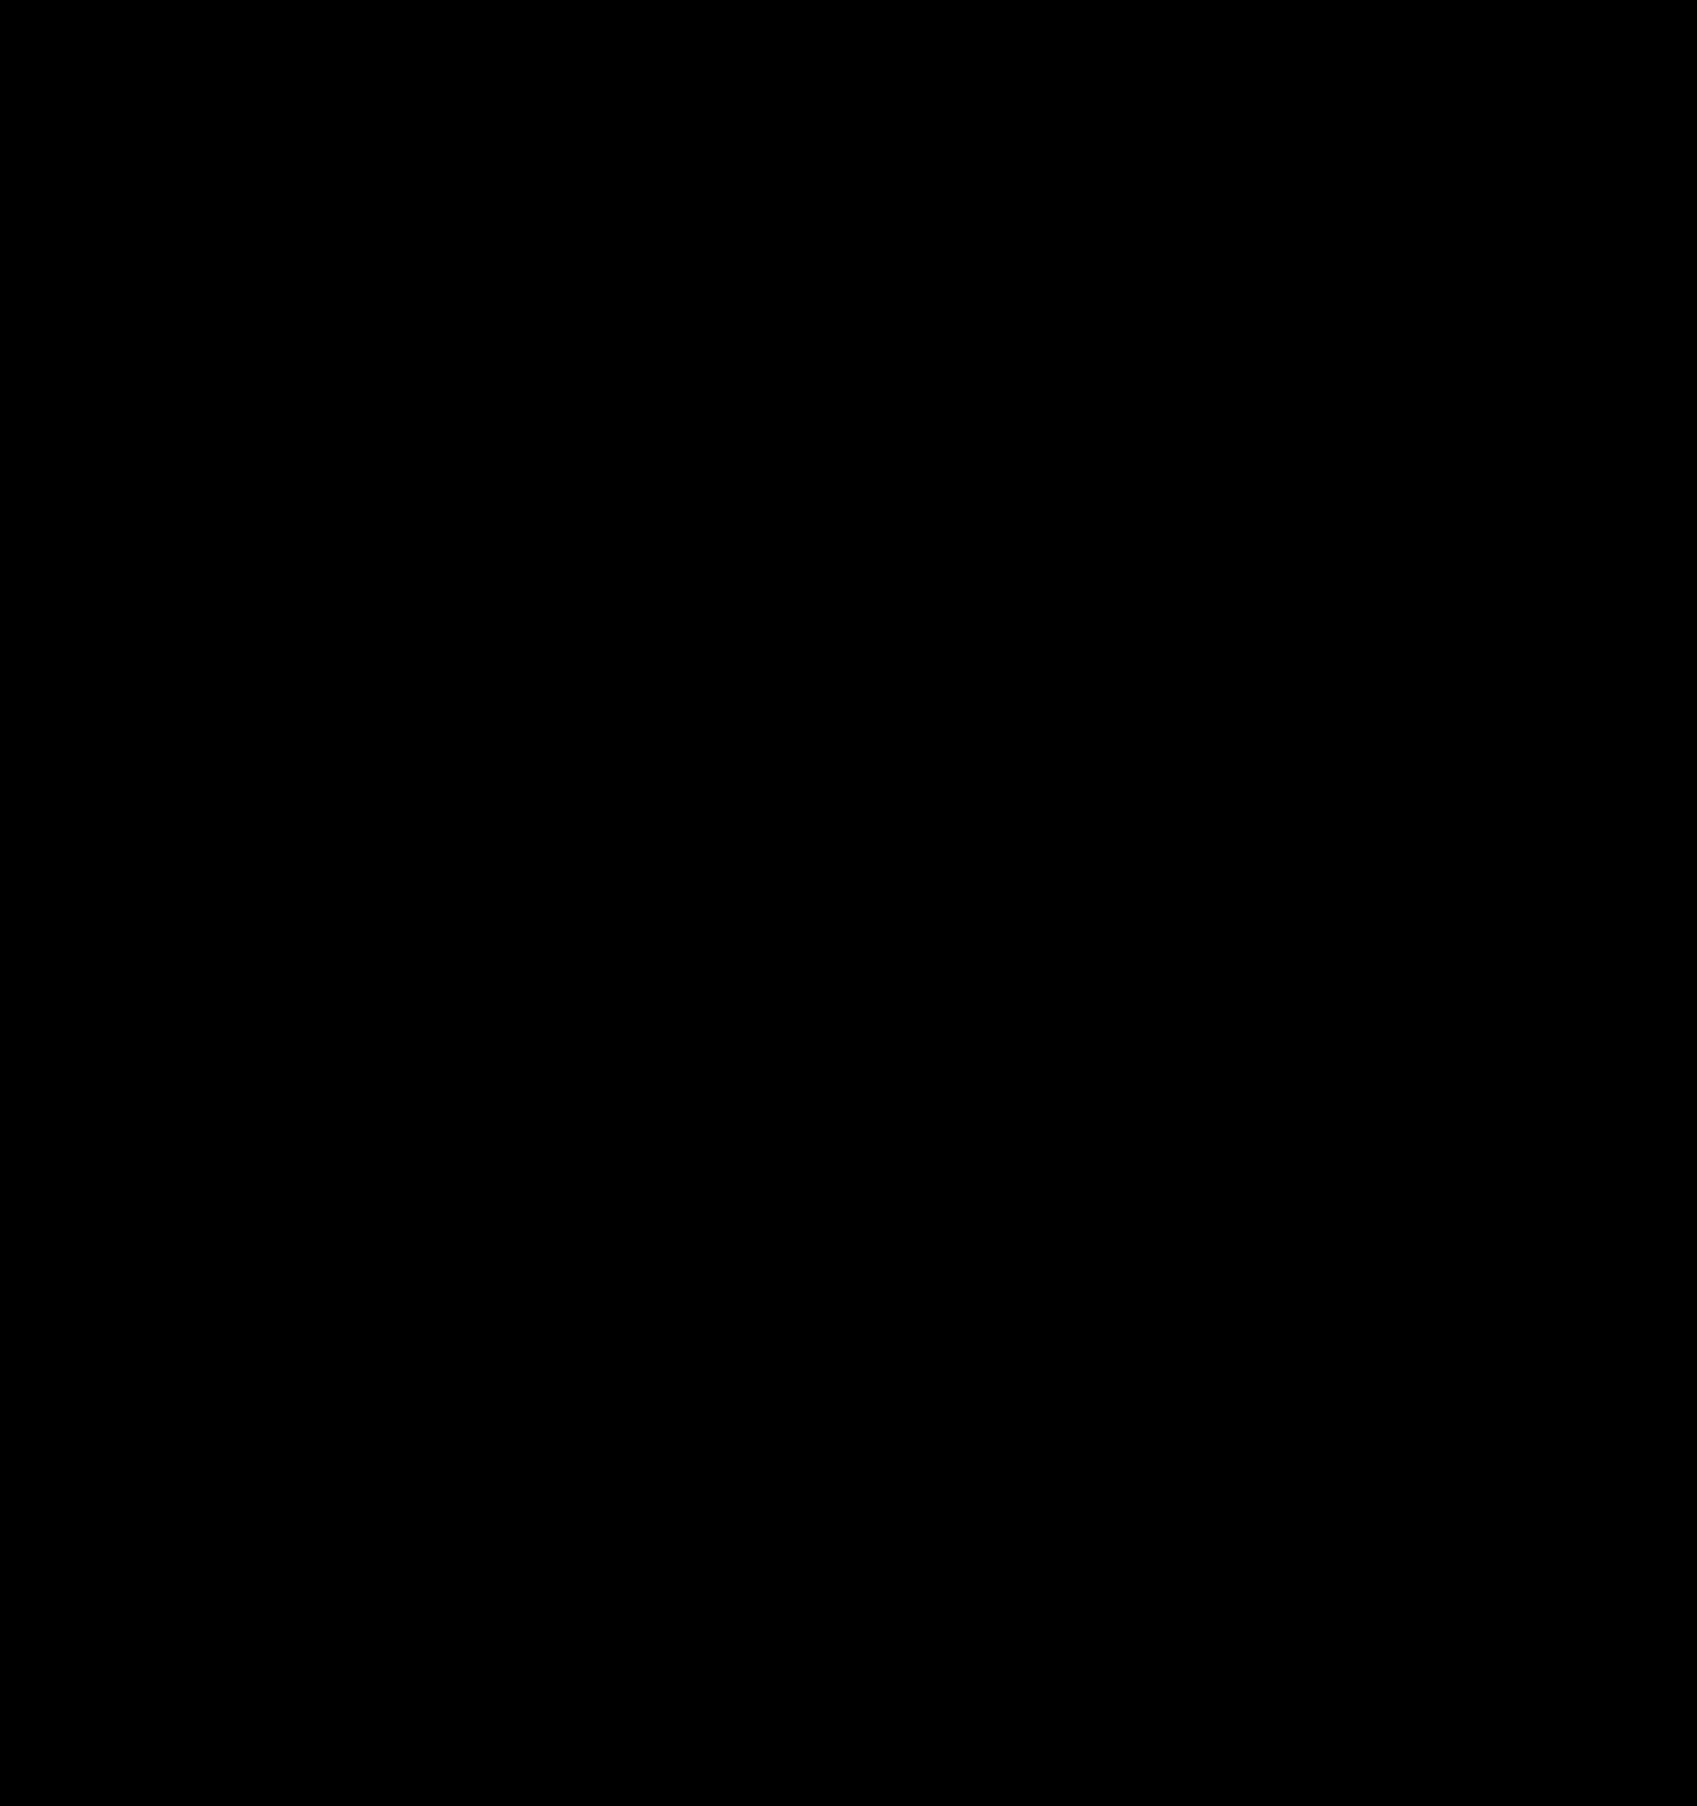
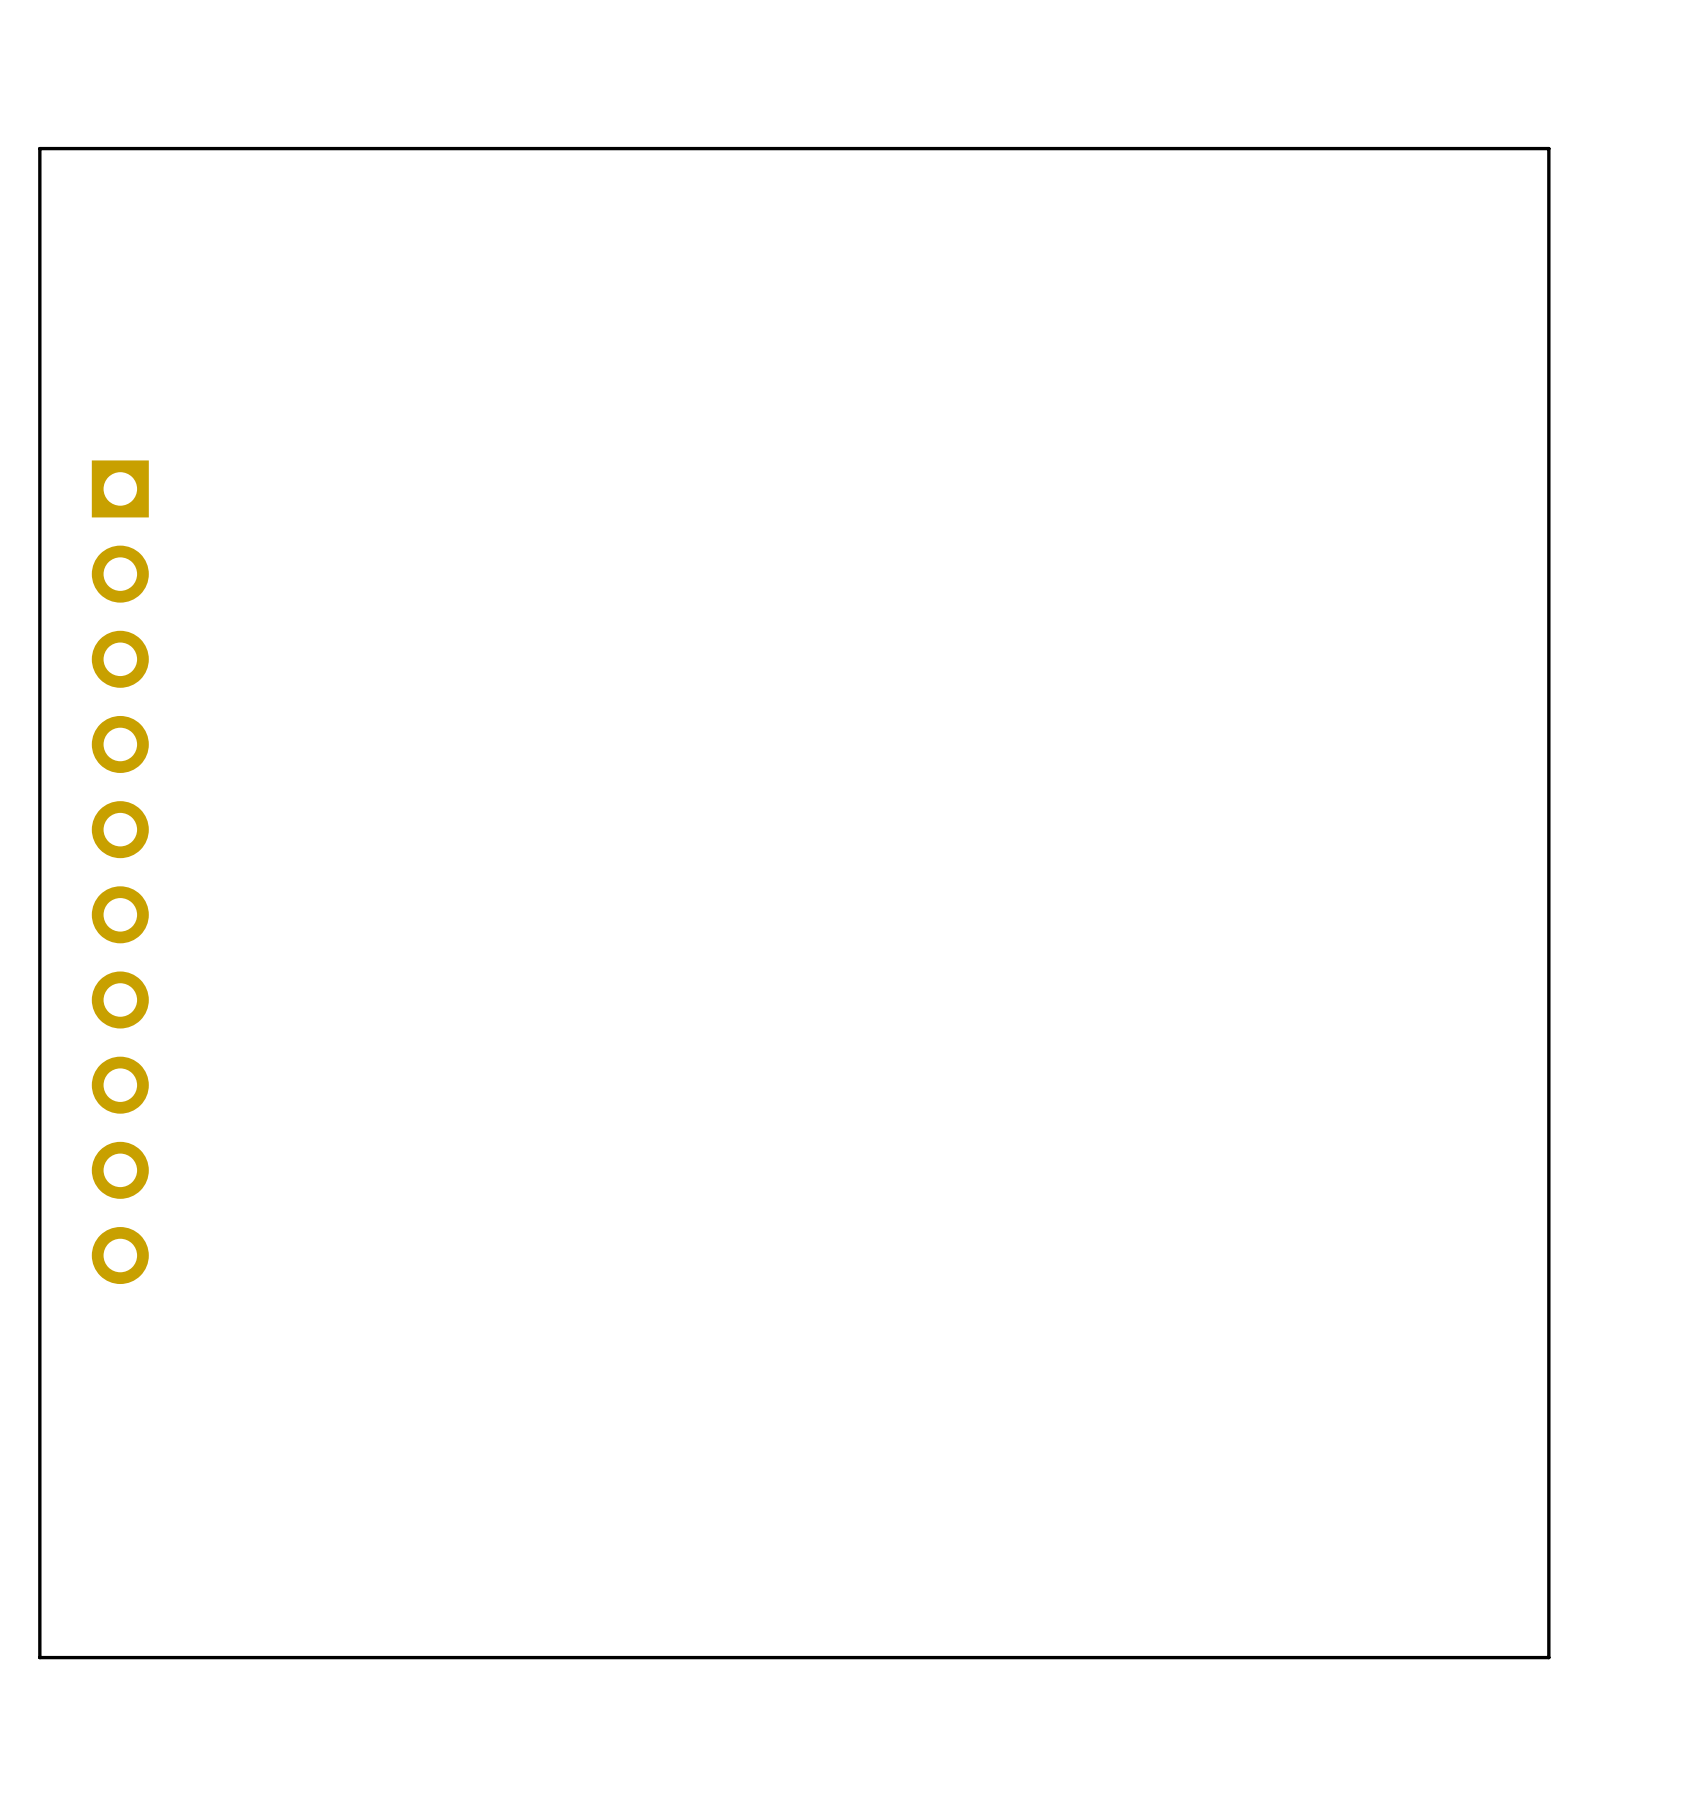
board edge: none -> (1548, 148) (39, 148) (39, 1657) (1548, 1657) (1548, 148)
part: none -> (120, 872)

